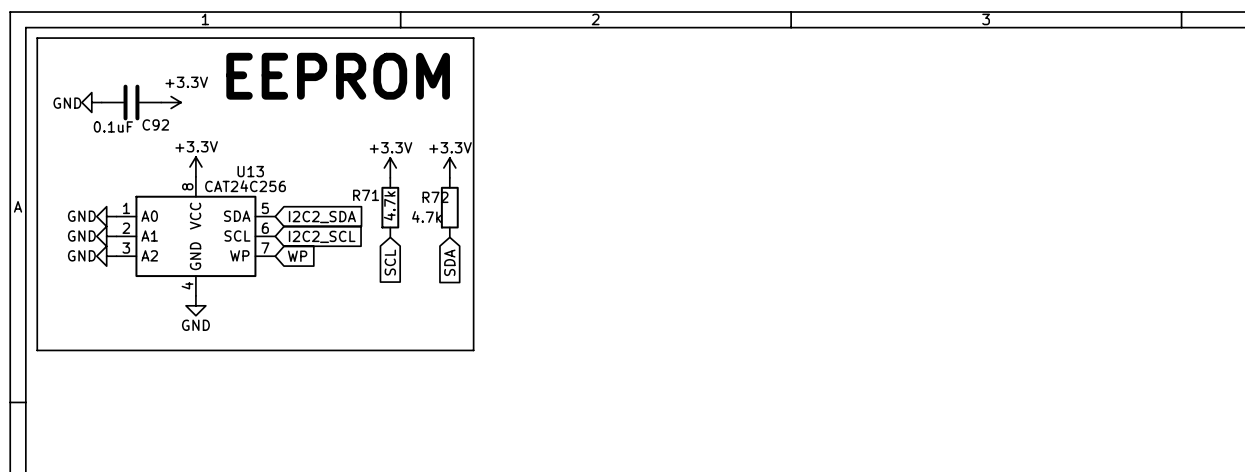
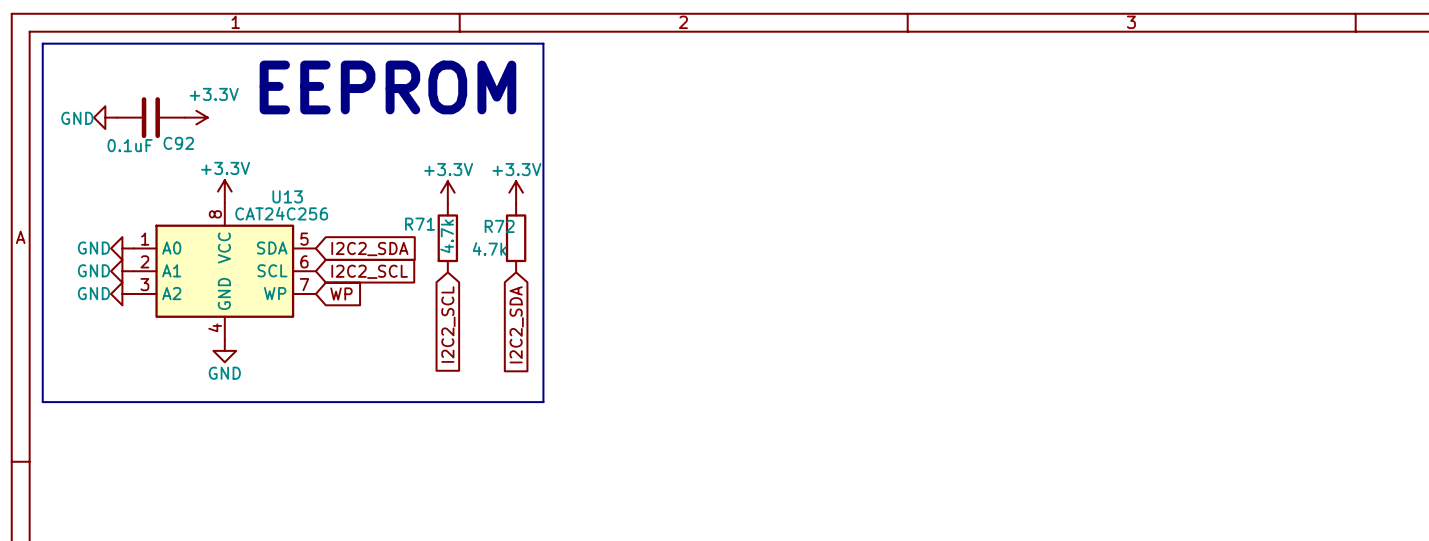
global label: SCL (390, 262) -> I2C2_SCL (448, 324)
global label: SDA (449, 262) -> I2C2_SDA (516, 324)

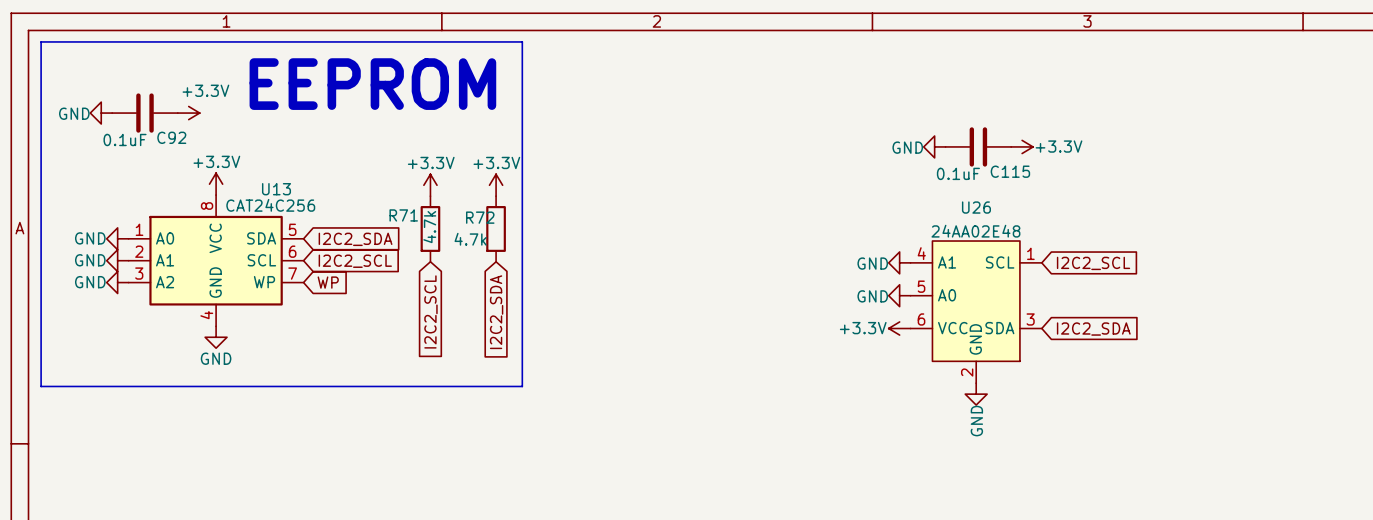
power symbol: none -> GND (934, 146)
C115: none -> 0.1uF (978, 146)
power symbol: none -> +3.3V (1022, 146)
power symbol: none -> GND (899, 262)
global label: none -> I2C2_SCL (1093, 263)
power symbol: none -> GND (899, 295)
U26: none -> 24AA02E48 (976, 312)
power symbol: none -> +3.3V (899, 328)
global label: none -> I2C2_SDA (1093, 329)
power symbol: none -> GND (976, 394)

